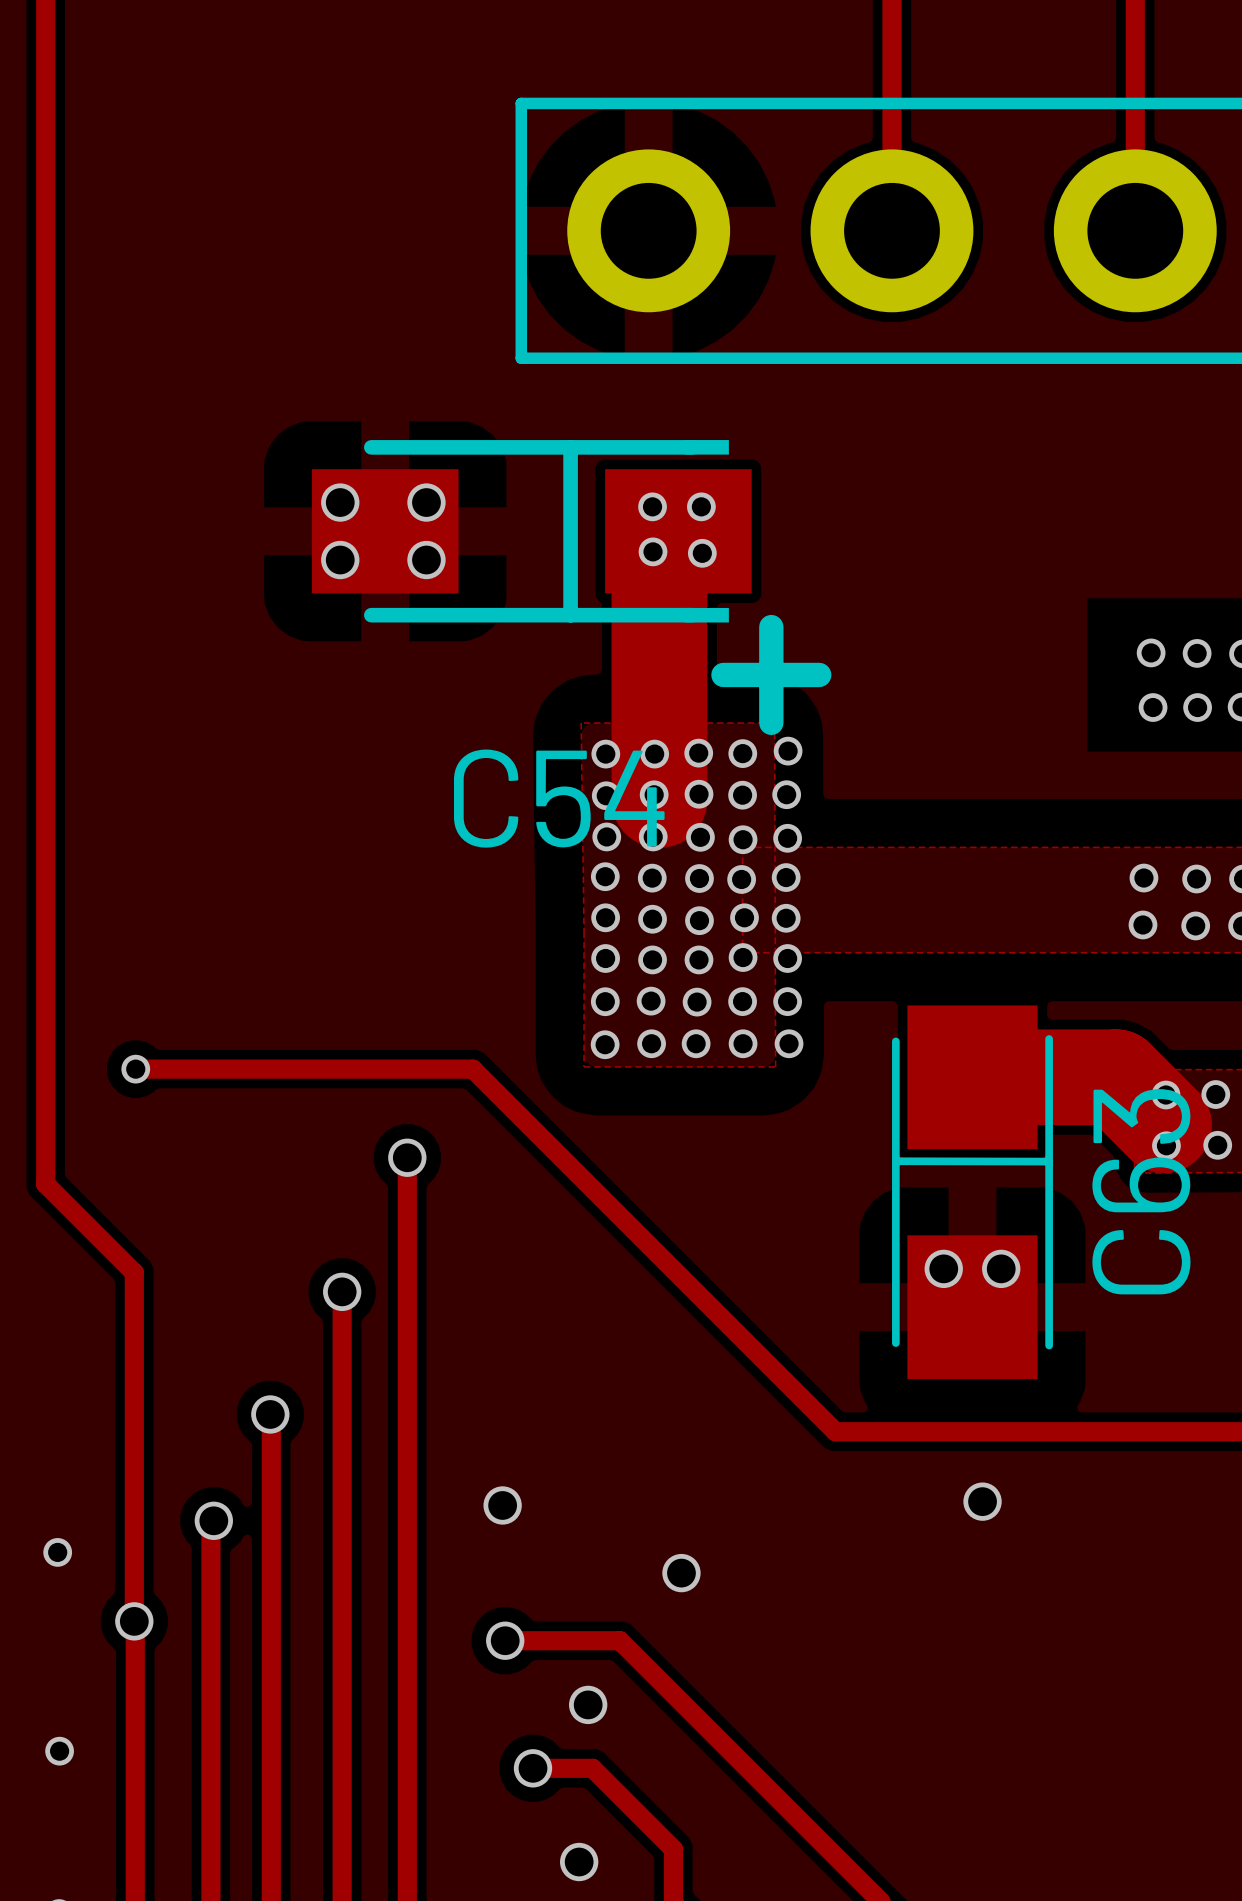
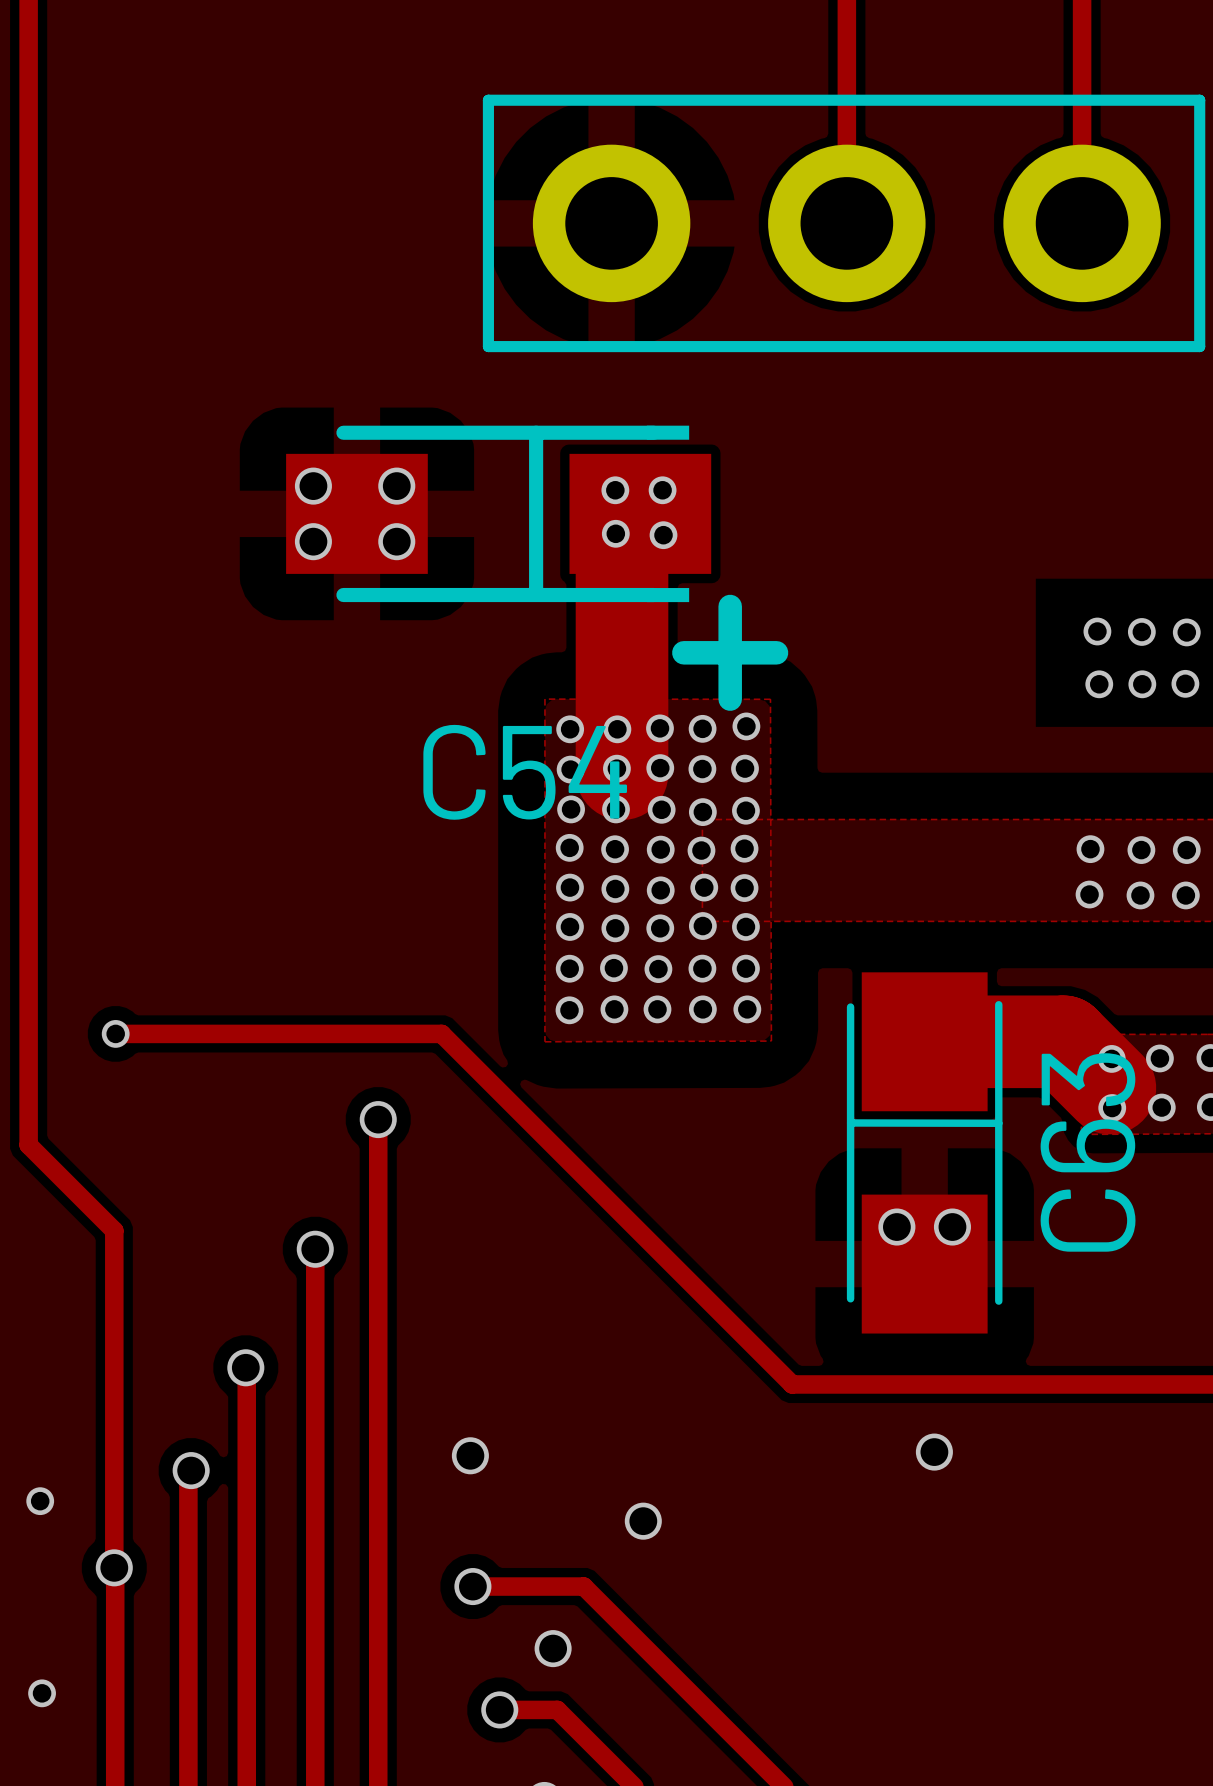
zone outline: (581, 723) (774, 723) (775, 1066) (584, 1066) (581, 723) -> (544, 699) (544, 1041) (771, 1041) (770, 699) (544, 699)

